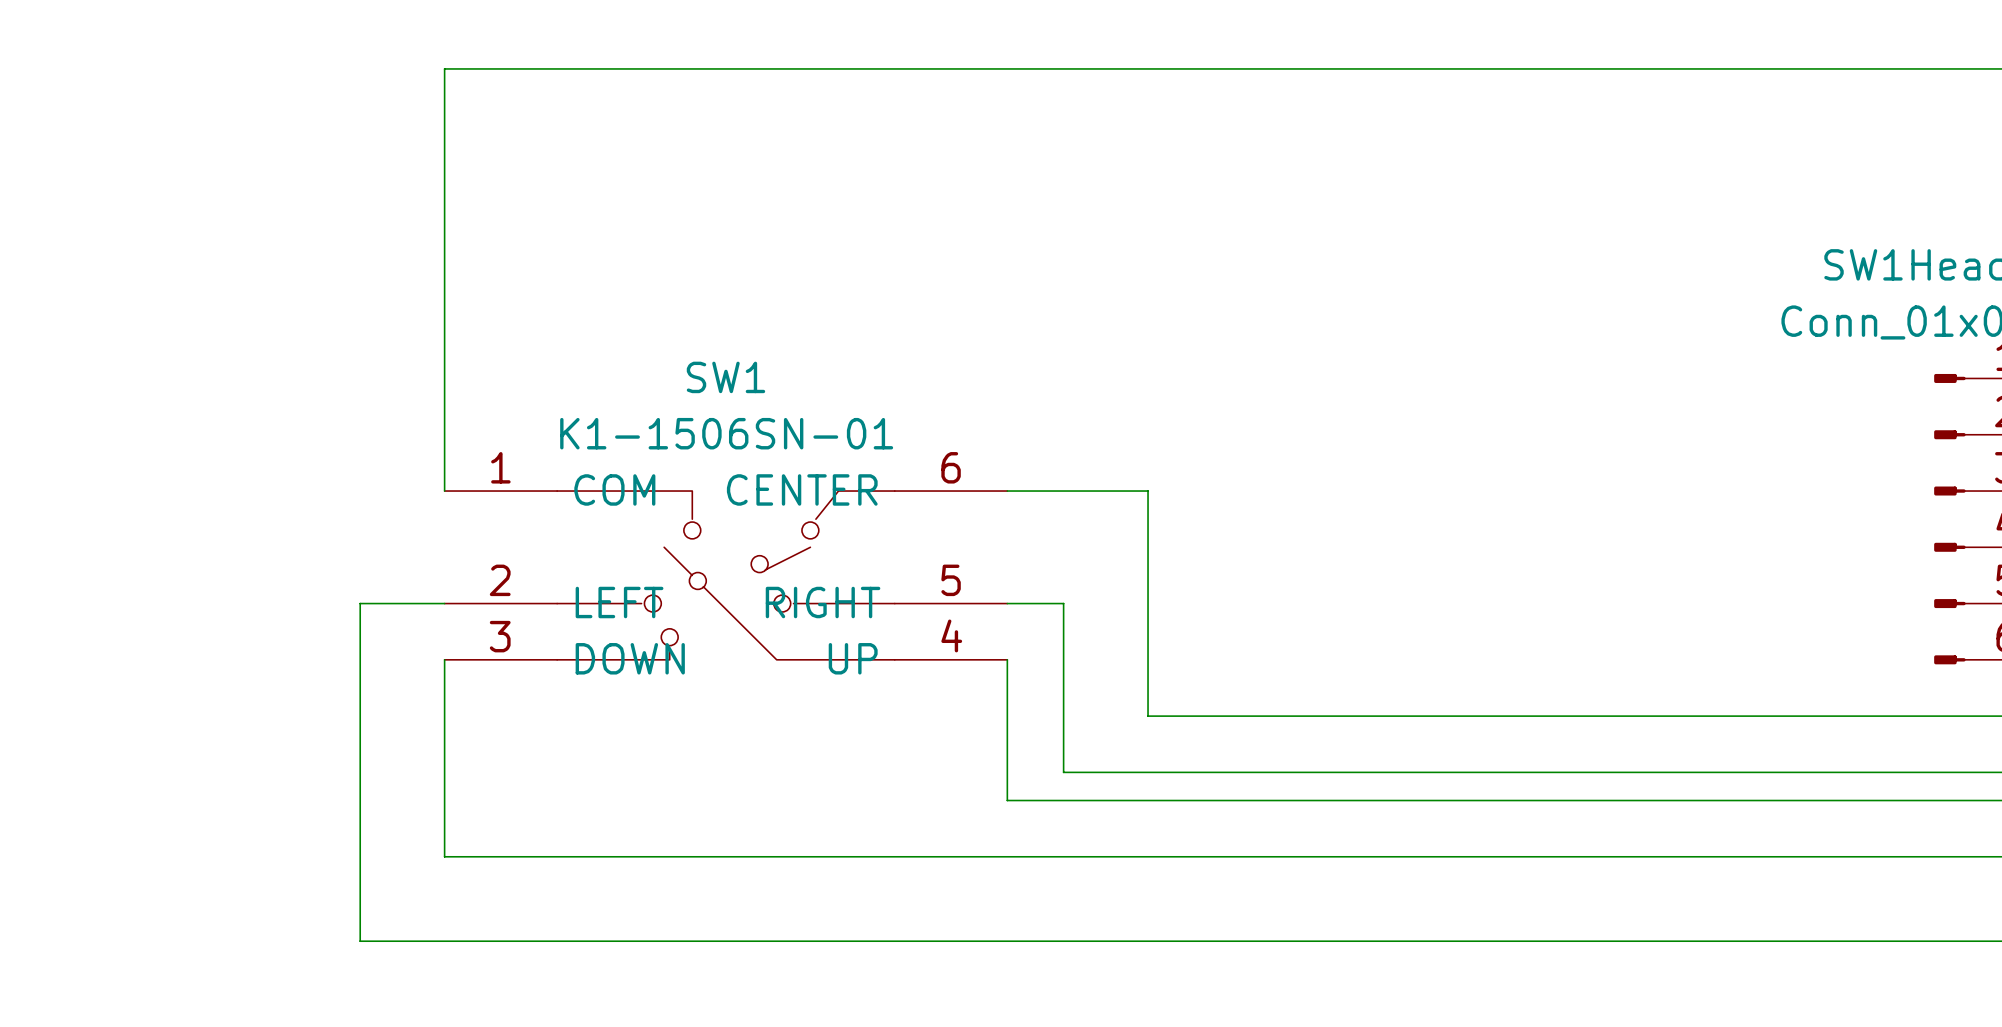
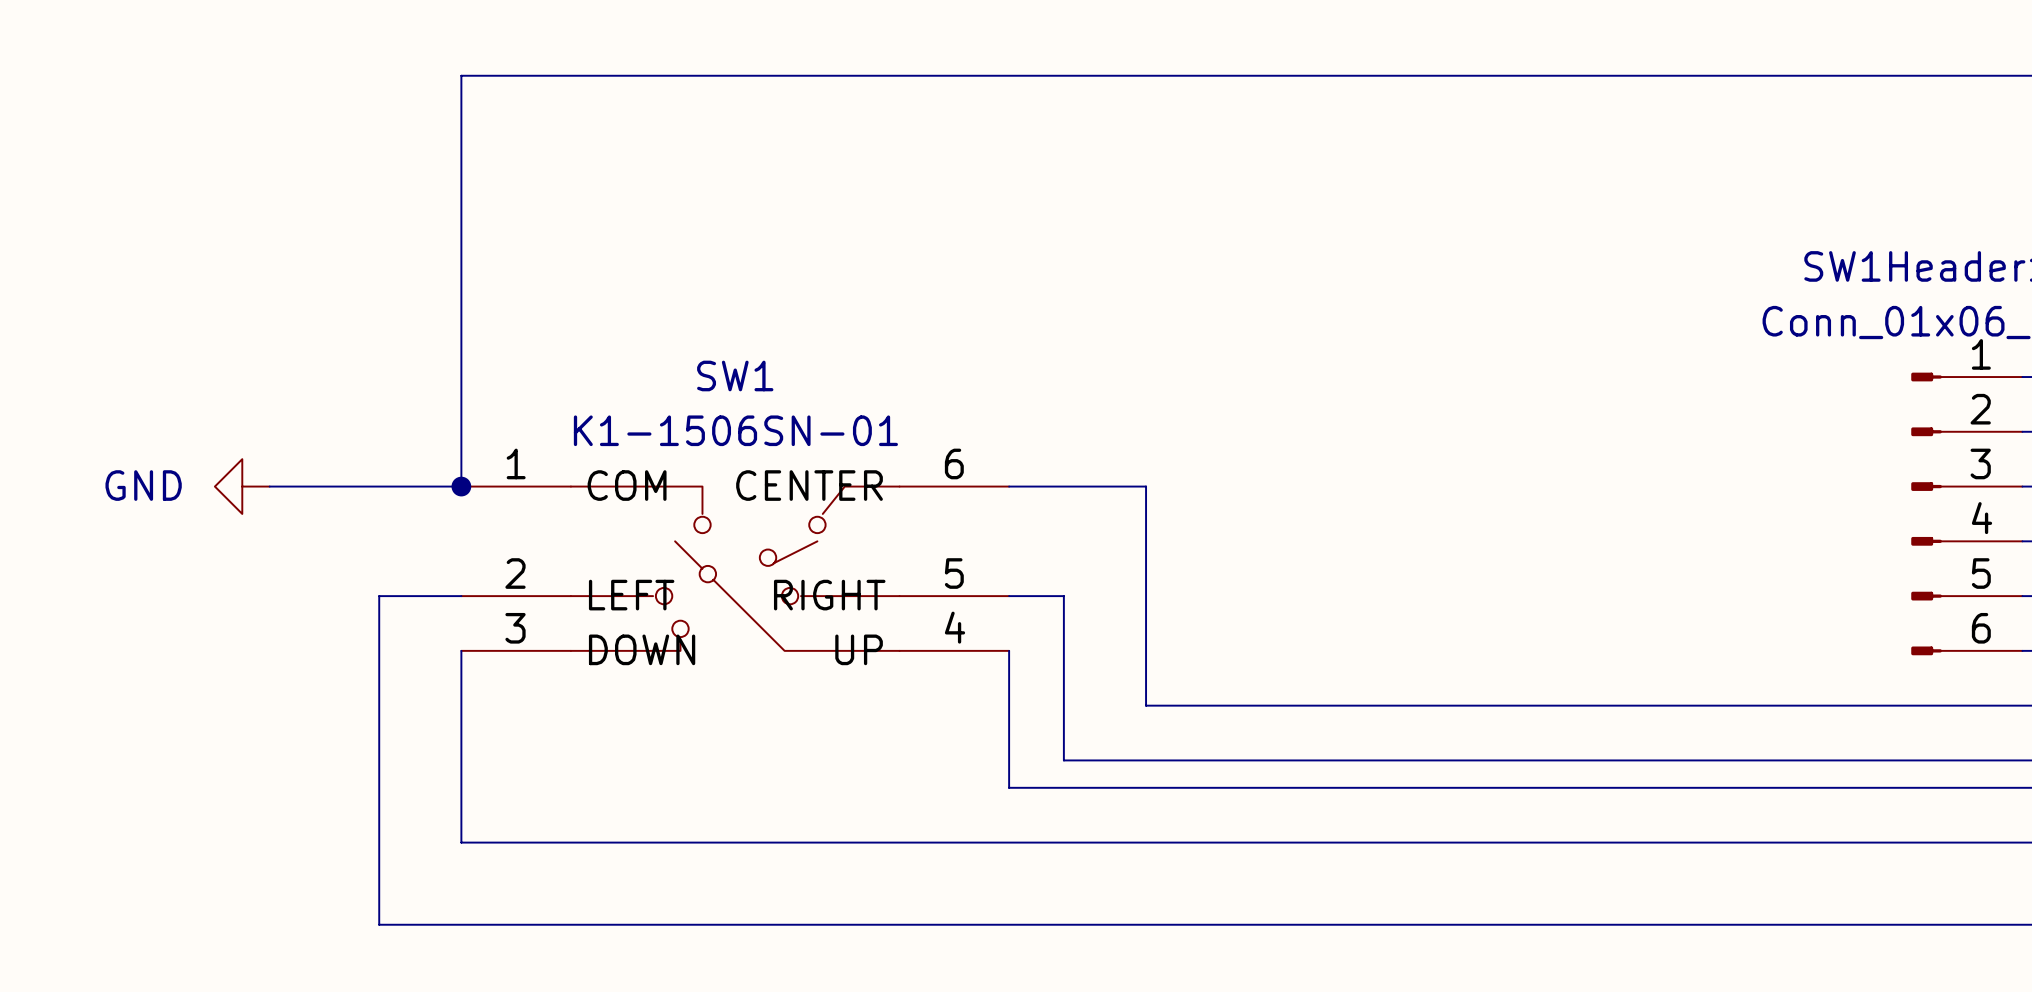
power symbol: none -> GND (242, 486)
wire: none -> (269, 486) (461, 486)
junction: none -> (461, 486)

